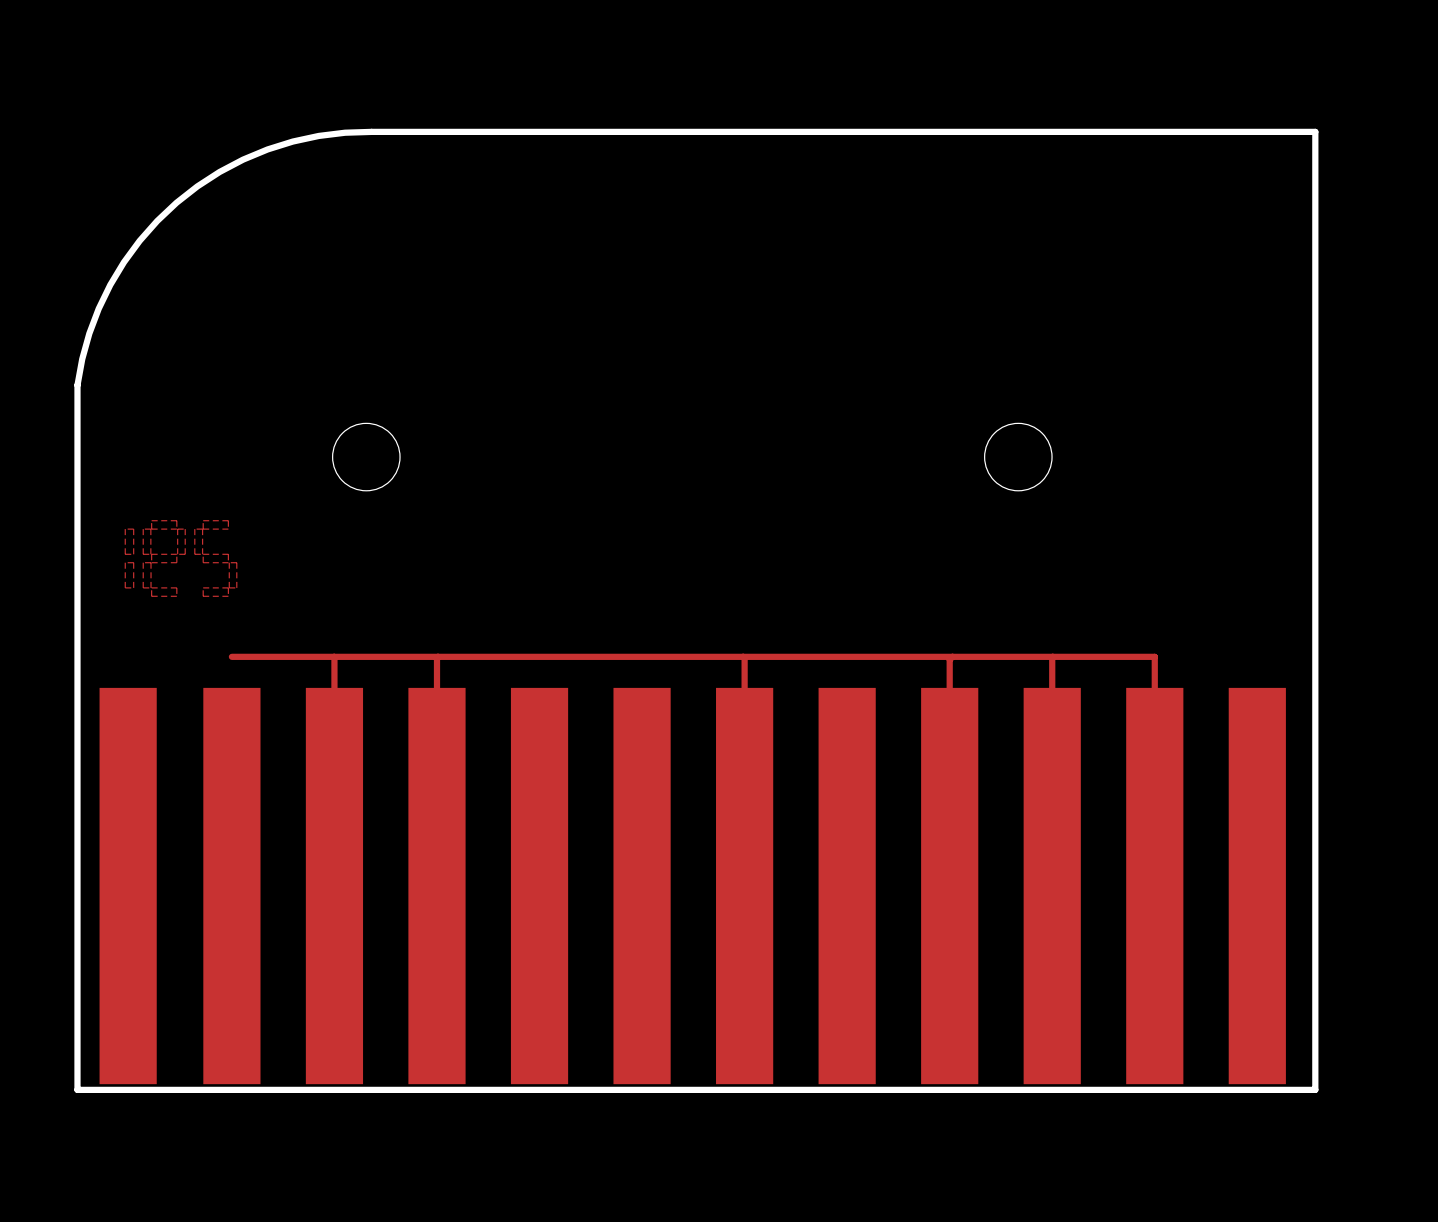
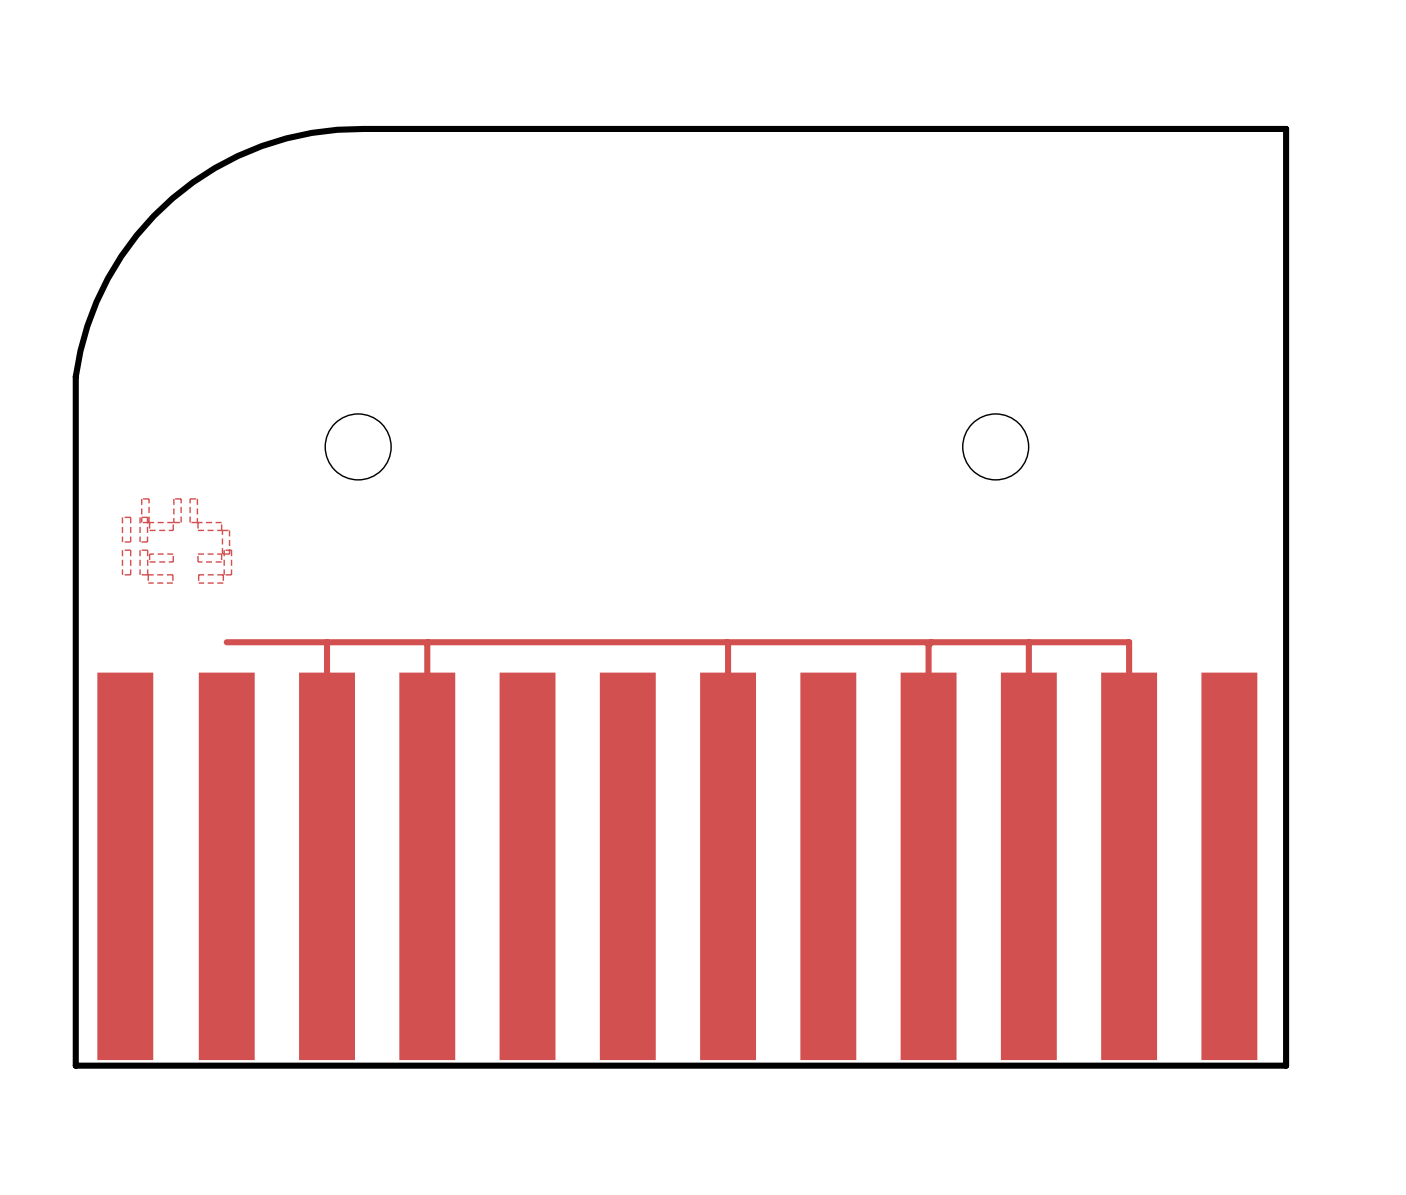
top zone outline: none -> (149, 498) (141, 498) (141, 522) (149, 522) (149, 498)
top zone outline: none -> (197, 498) (197, 522) (190, 522) (190, 498) (197, 498)
top zone outline: (176, 520) (151, 520) (151, 529) (176, 529) (176, 520) -> none
top zone outline: (228, 520) (228, 529) (203, 529) (203, 520) (228, 520) -> none
top zone outline: (185, 529) (177, 529) (177, 554) (185, 554) (185, 534) -> (181, 517) (181, 498) (173, 498) (173, 522) (181, 522)
top zone outline: none -> (173, 522) (149, 522) (149, 530) (173, 530) (173, 522)
top zone outline: (202, 534) (202, 529) (194, 529) (194, 554) (202, 554) (202, 542) -> (198, 522) (221, 522) (221, 530) (198, 530)
top zone outline: none -> (229, 530) (222, 530) (222, 554) (229, 554) (229, 530)
top zone outline: (176, 554) (151, 554) (151, 562) (176, 562) (176, 554) -> none
top zone outline: (228, 554) (228, 562) (203, 562) (203, 554) (228, 554) -> none
top zone outline: none -> (173, 554) (149, 554) (149, 561) (173, 561) (173, 554)
top zone outline: none -> (221, 554) (221, 561) (198, 561) (198, 554) (221, 554)

